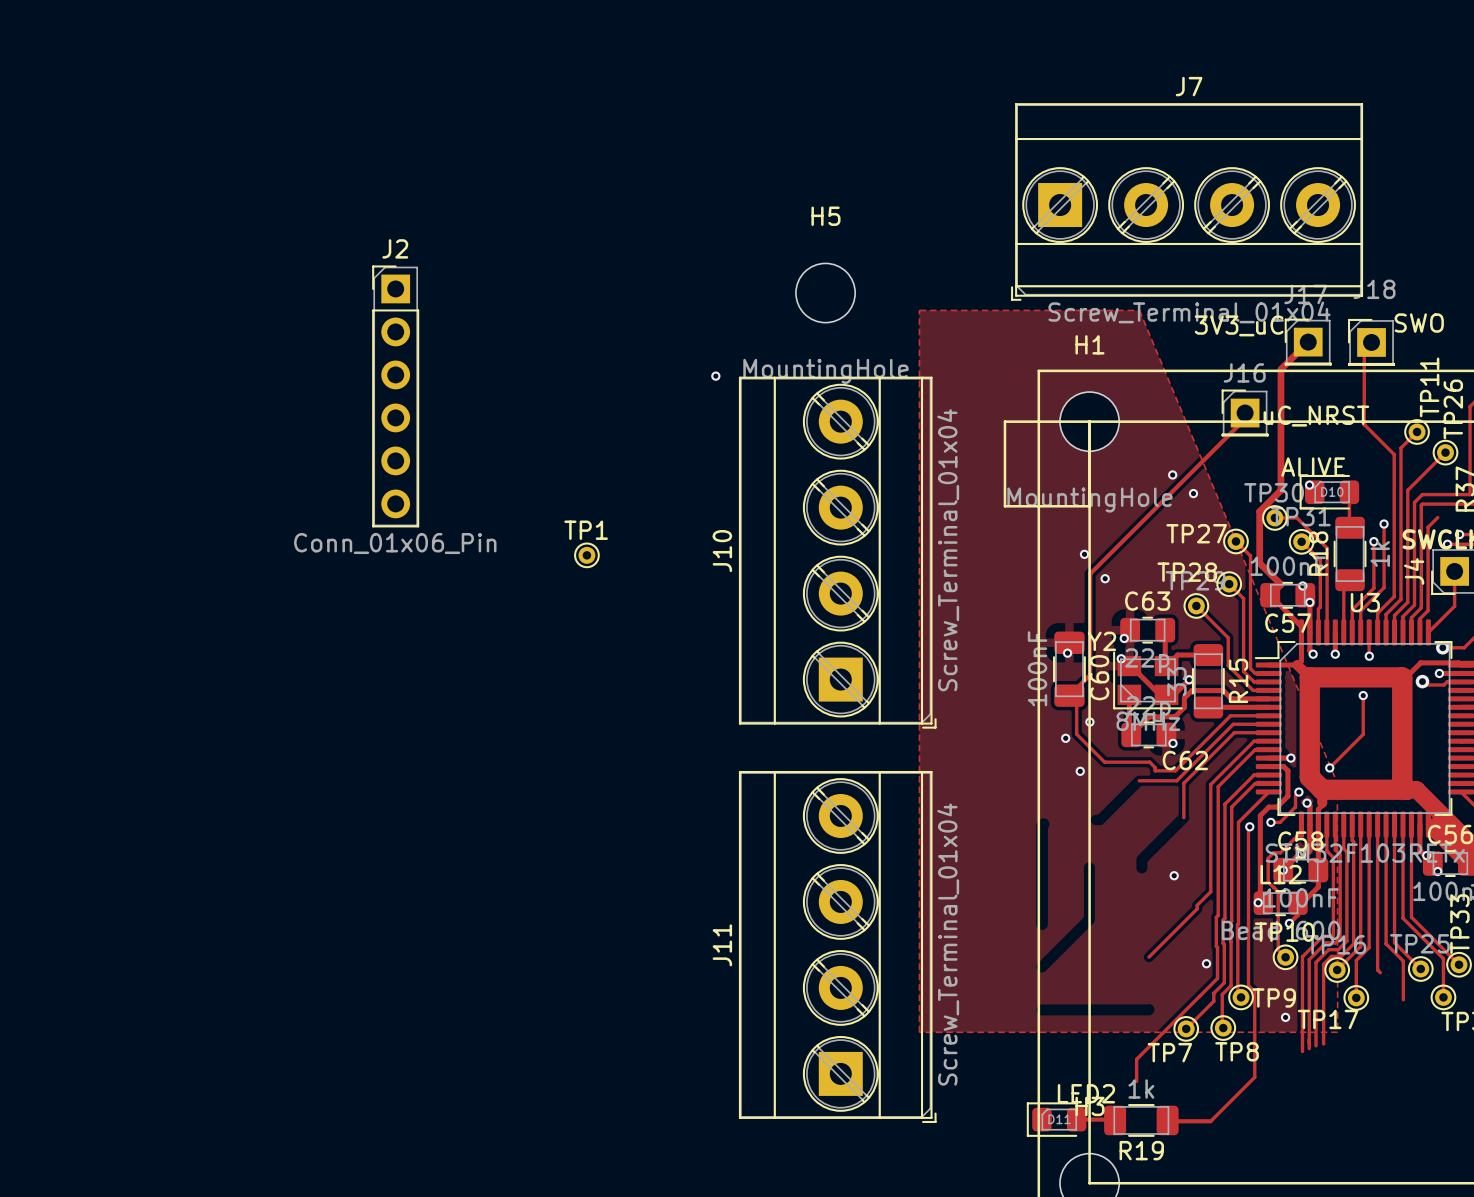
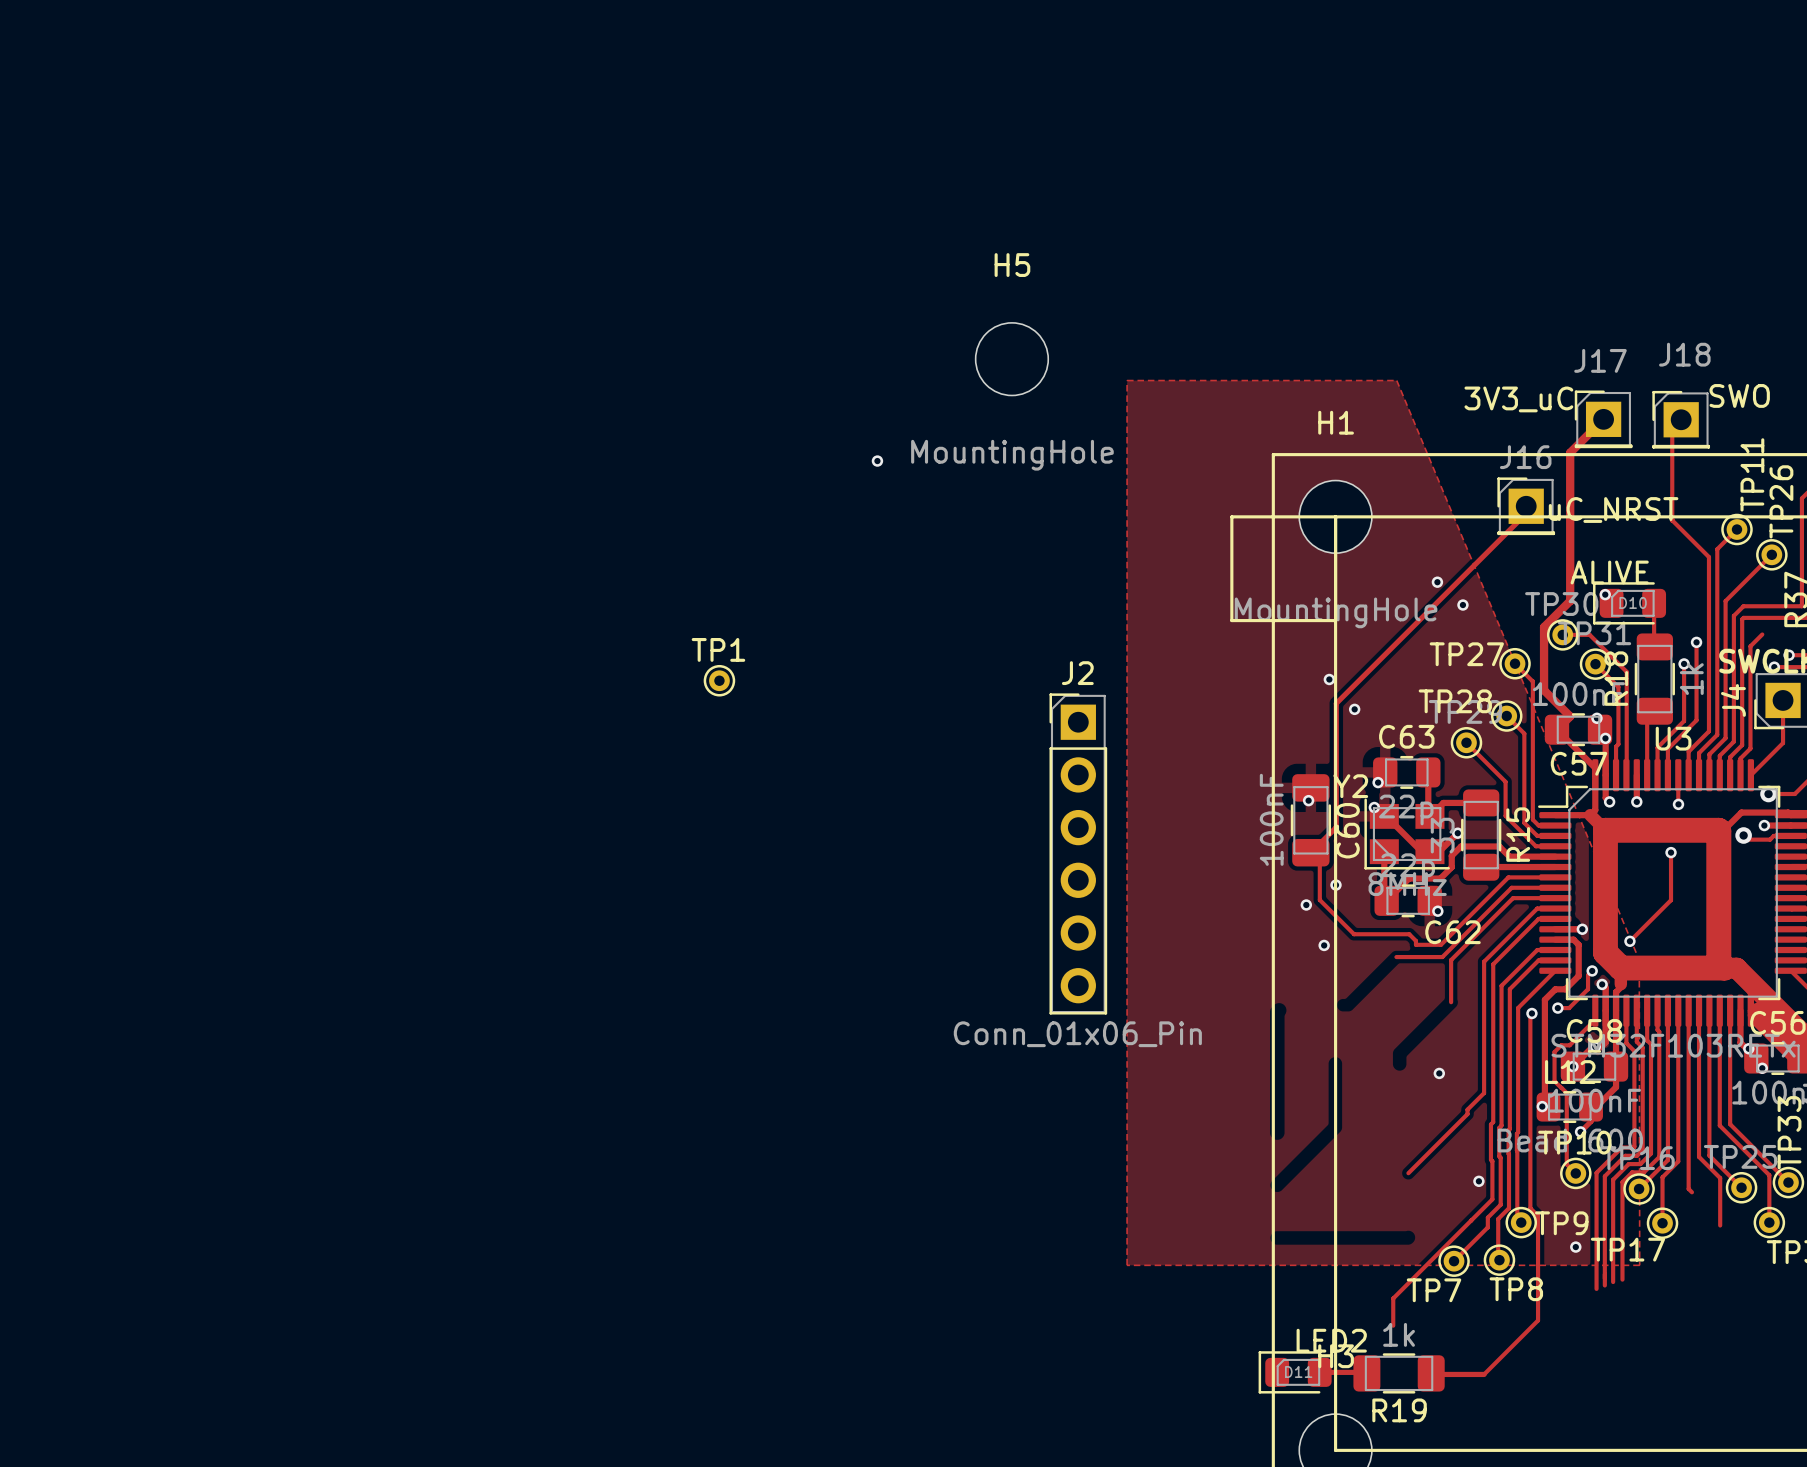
J7: Screw_Terminal_01x04 (1187, 201) -> none
J2 position: (395, 396) -> (1078, 853)
J10: Screw_Terminal_01x04 (837, 552) -> none
J11: Screw_Terminal_01x04 (837, 946) -> none

